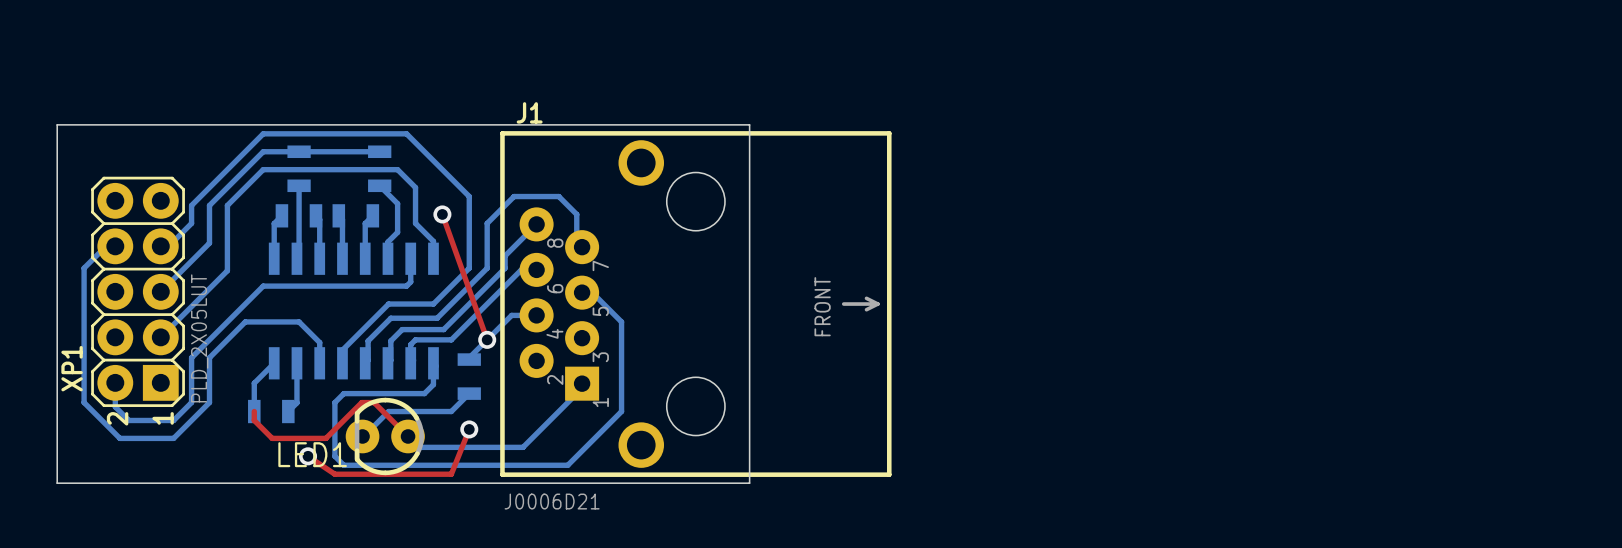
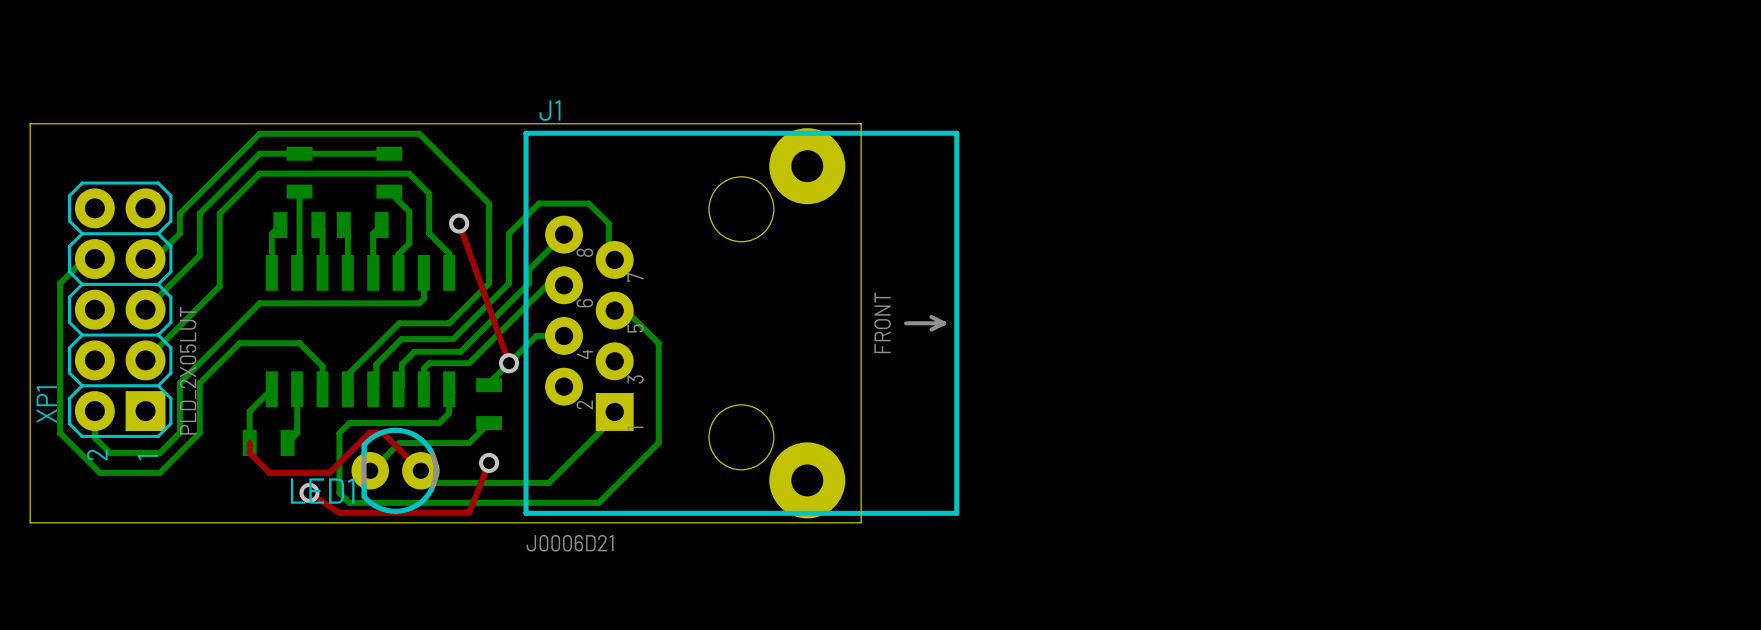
board edge: (749, 124) (749, 483) -> (801, 123) (861, 123) (861, 522) (801, 522)
J1 footprint: [500, 131, 892, 477] -> [523, 128, 960, 519]

